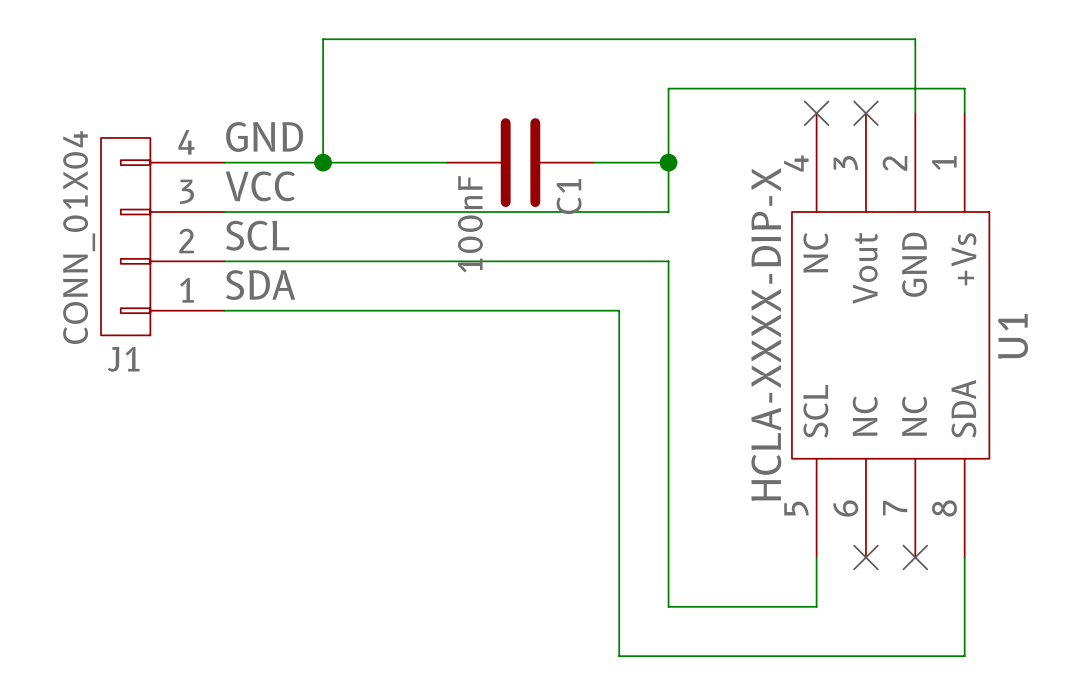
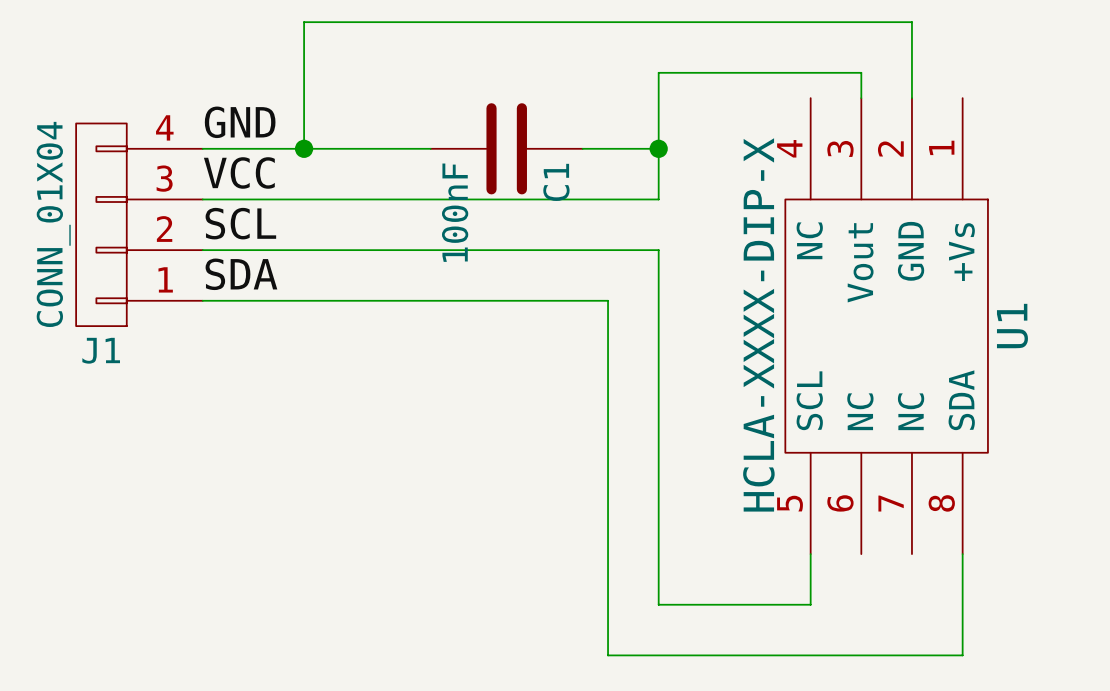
wire: (865, 88) (964, 88) (964, 113) -> (861, 72) (861, 98)
no-connect mark: (816, 113) -> none
no-connect mark: (865, 113) -> none
no-connect mark: (865, 557) -> none
no-connect mark: (915, 557) -> none

